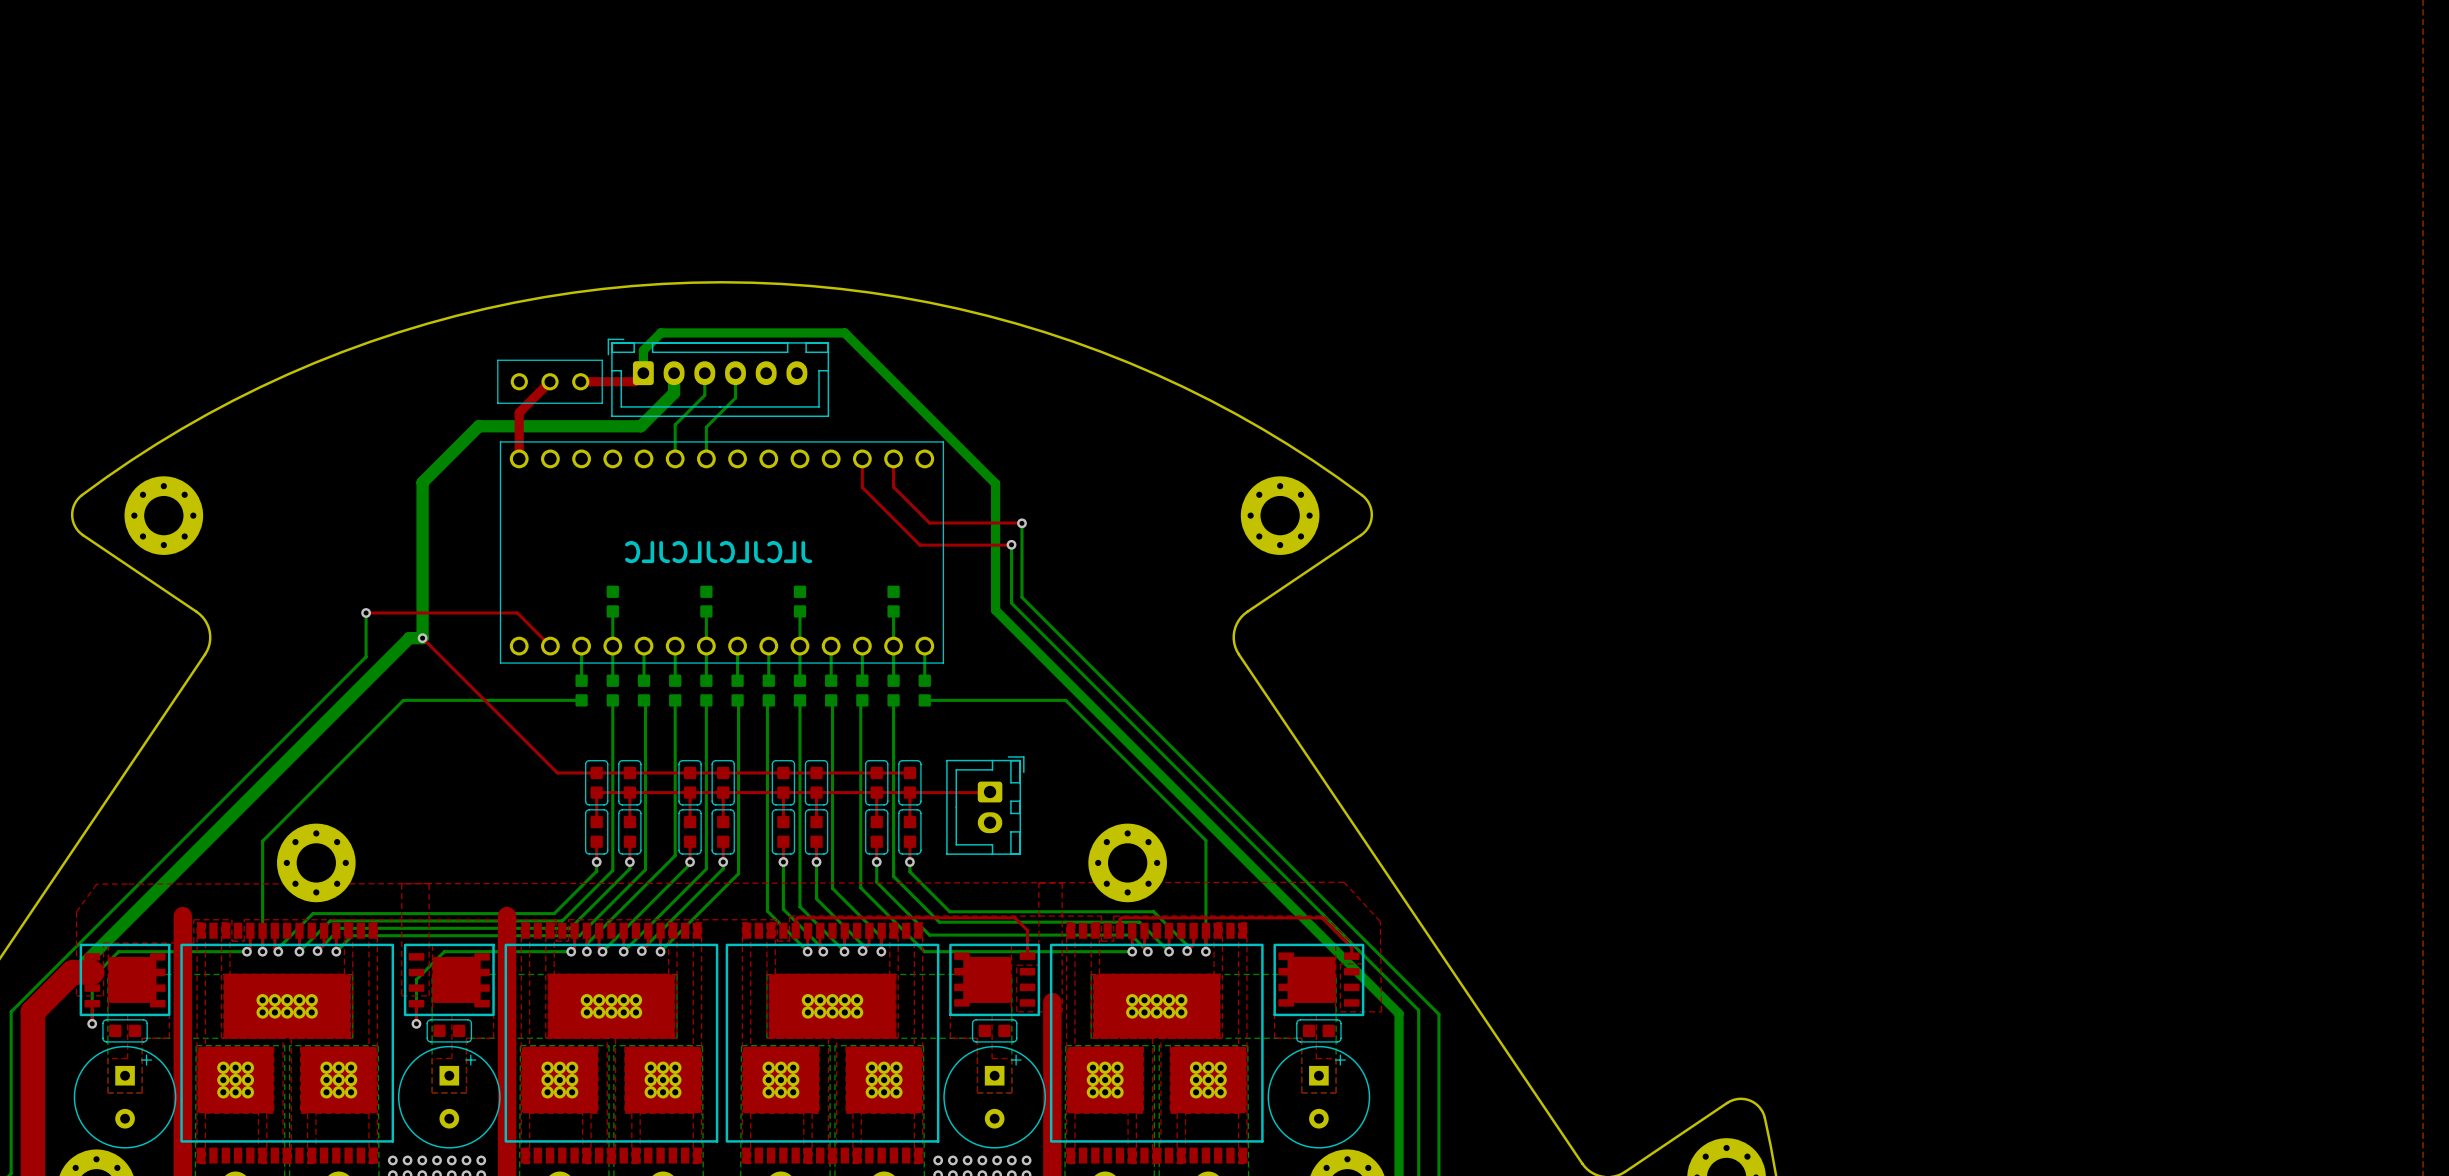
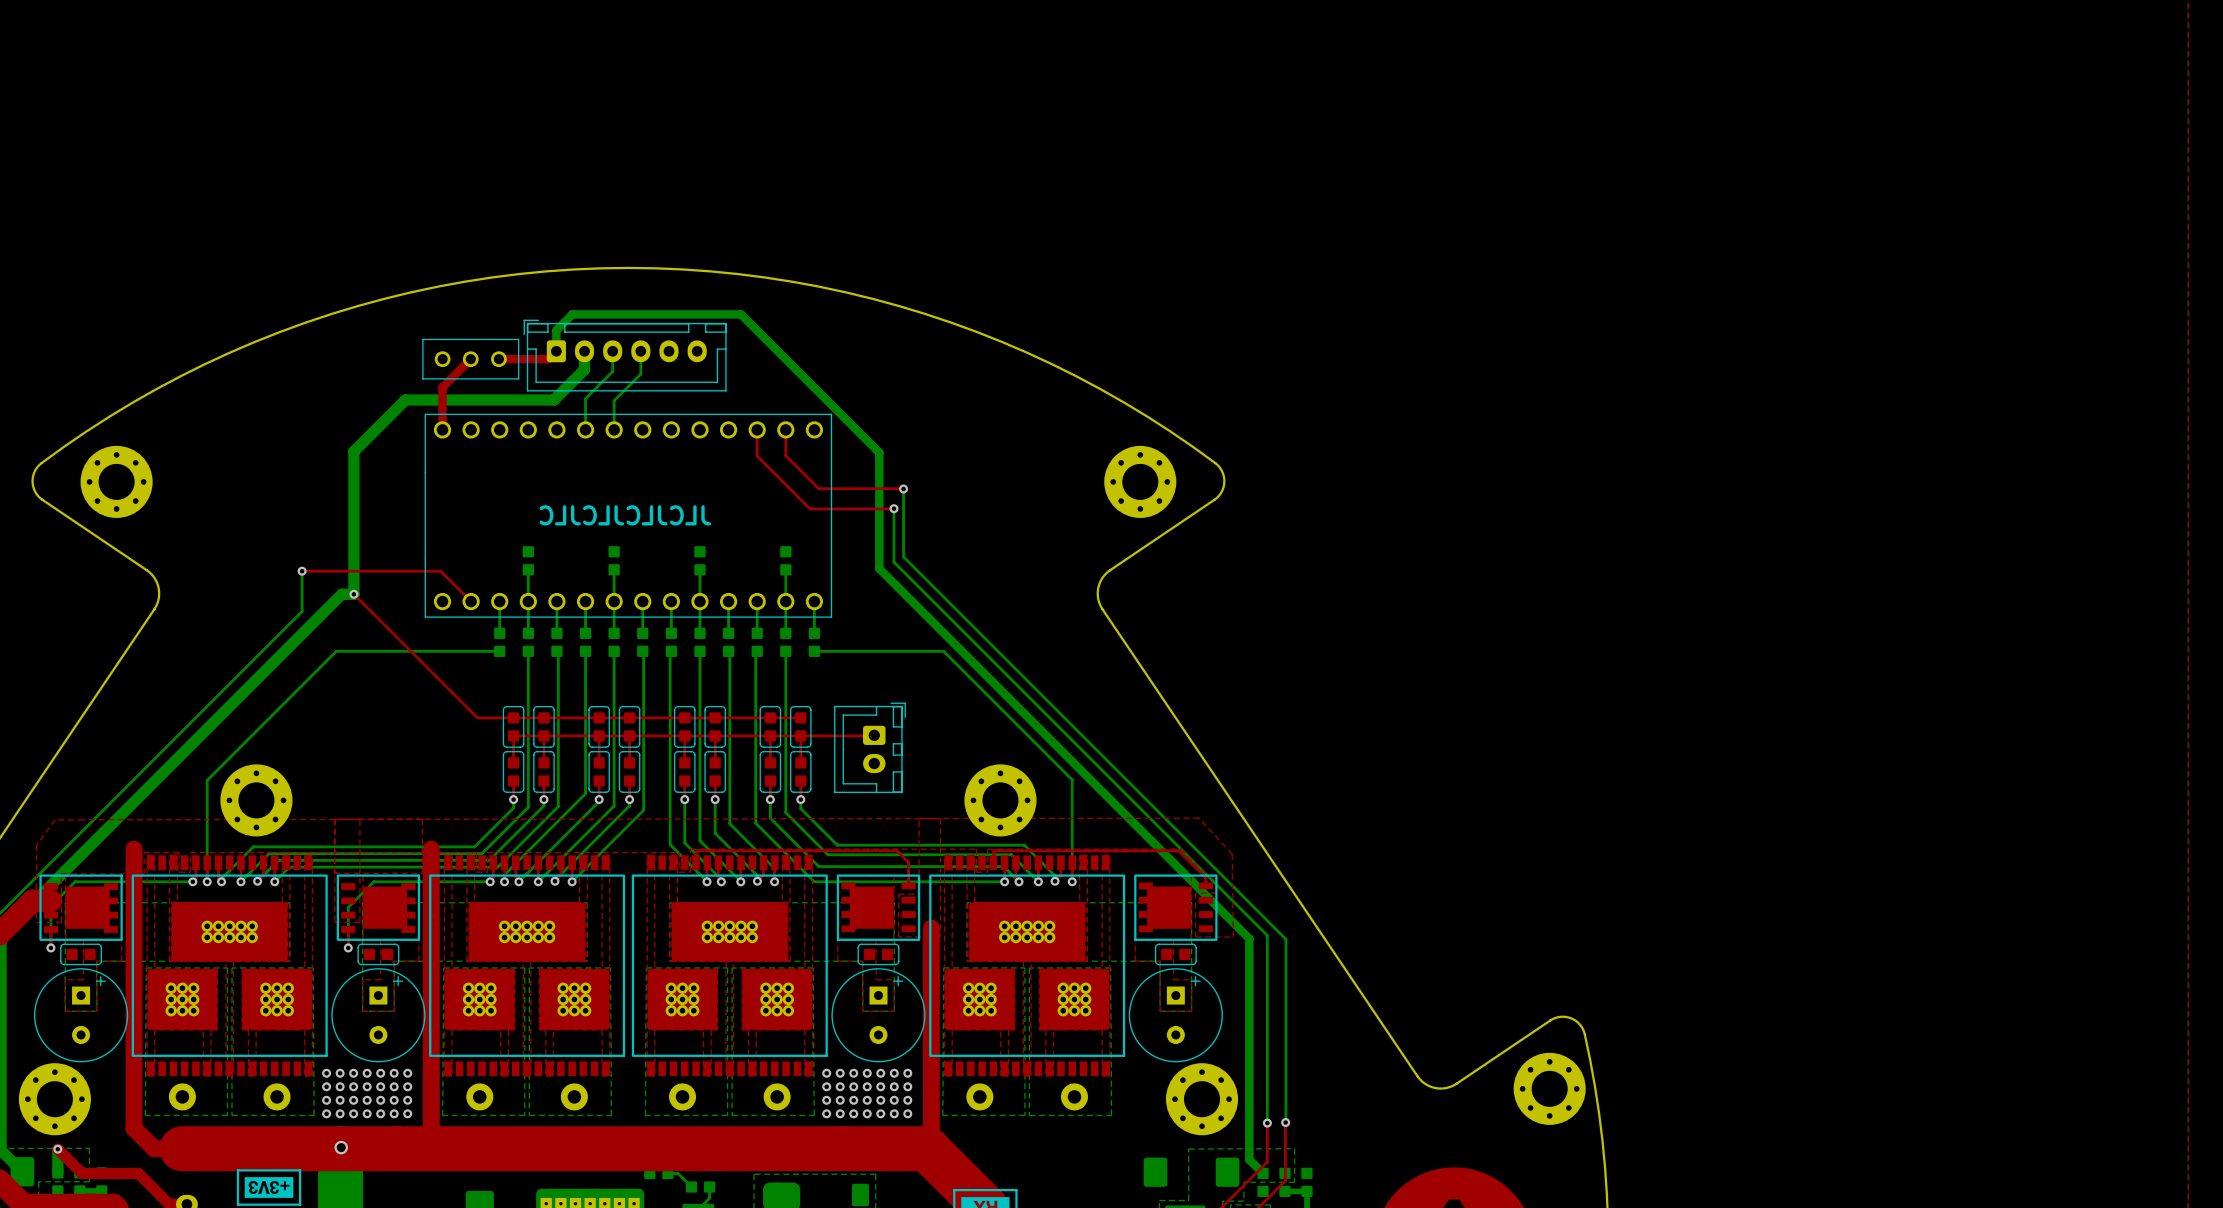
top zone outline: none -> (422, 819) (422, 873) (334, 873) (334, 819) (422, 819)

